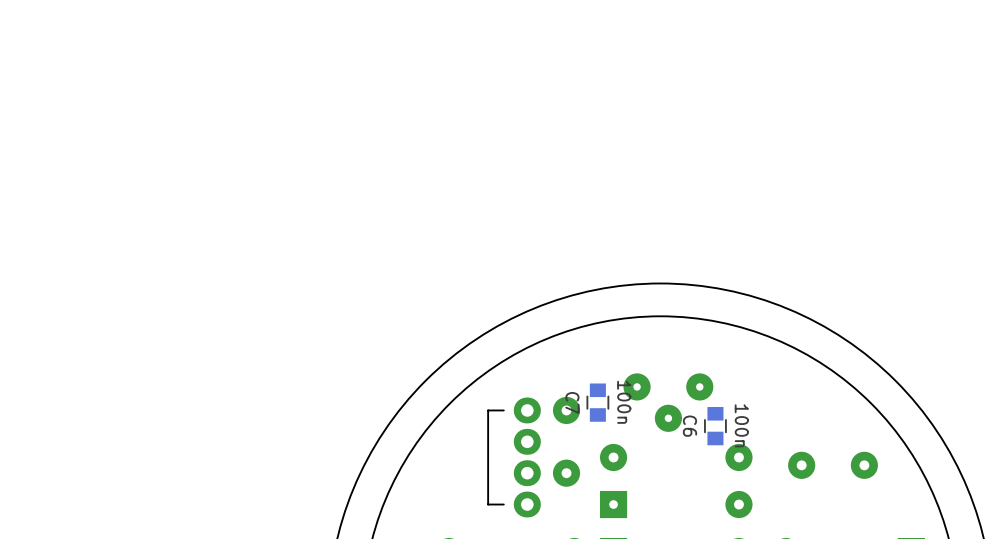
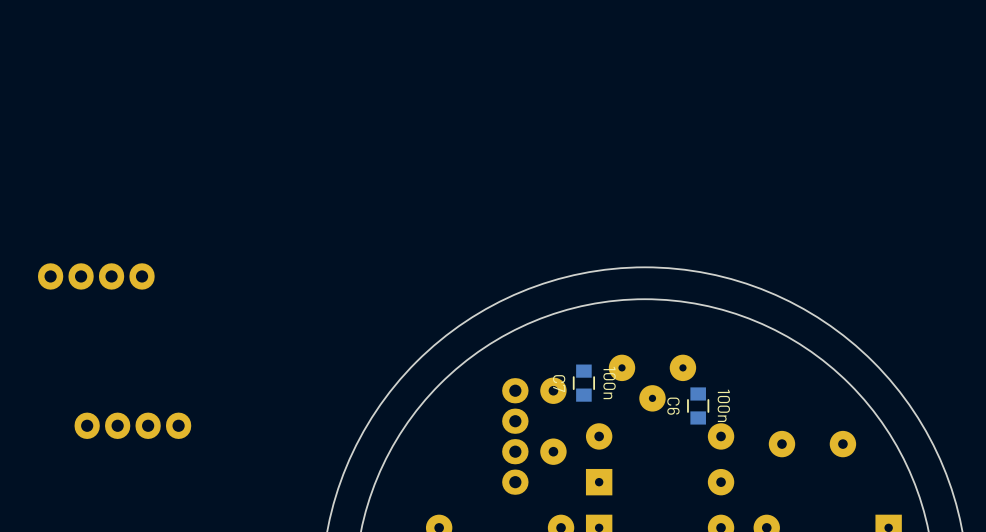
part: none -> (96, 276)
board edge: (503, 410) (488, 410) (488, 504) (503, 504) -> none
part: none -> (132, 425)

